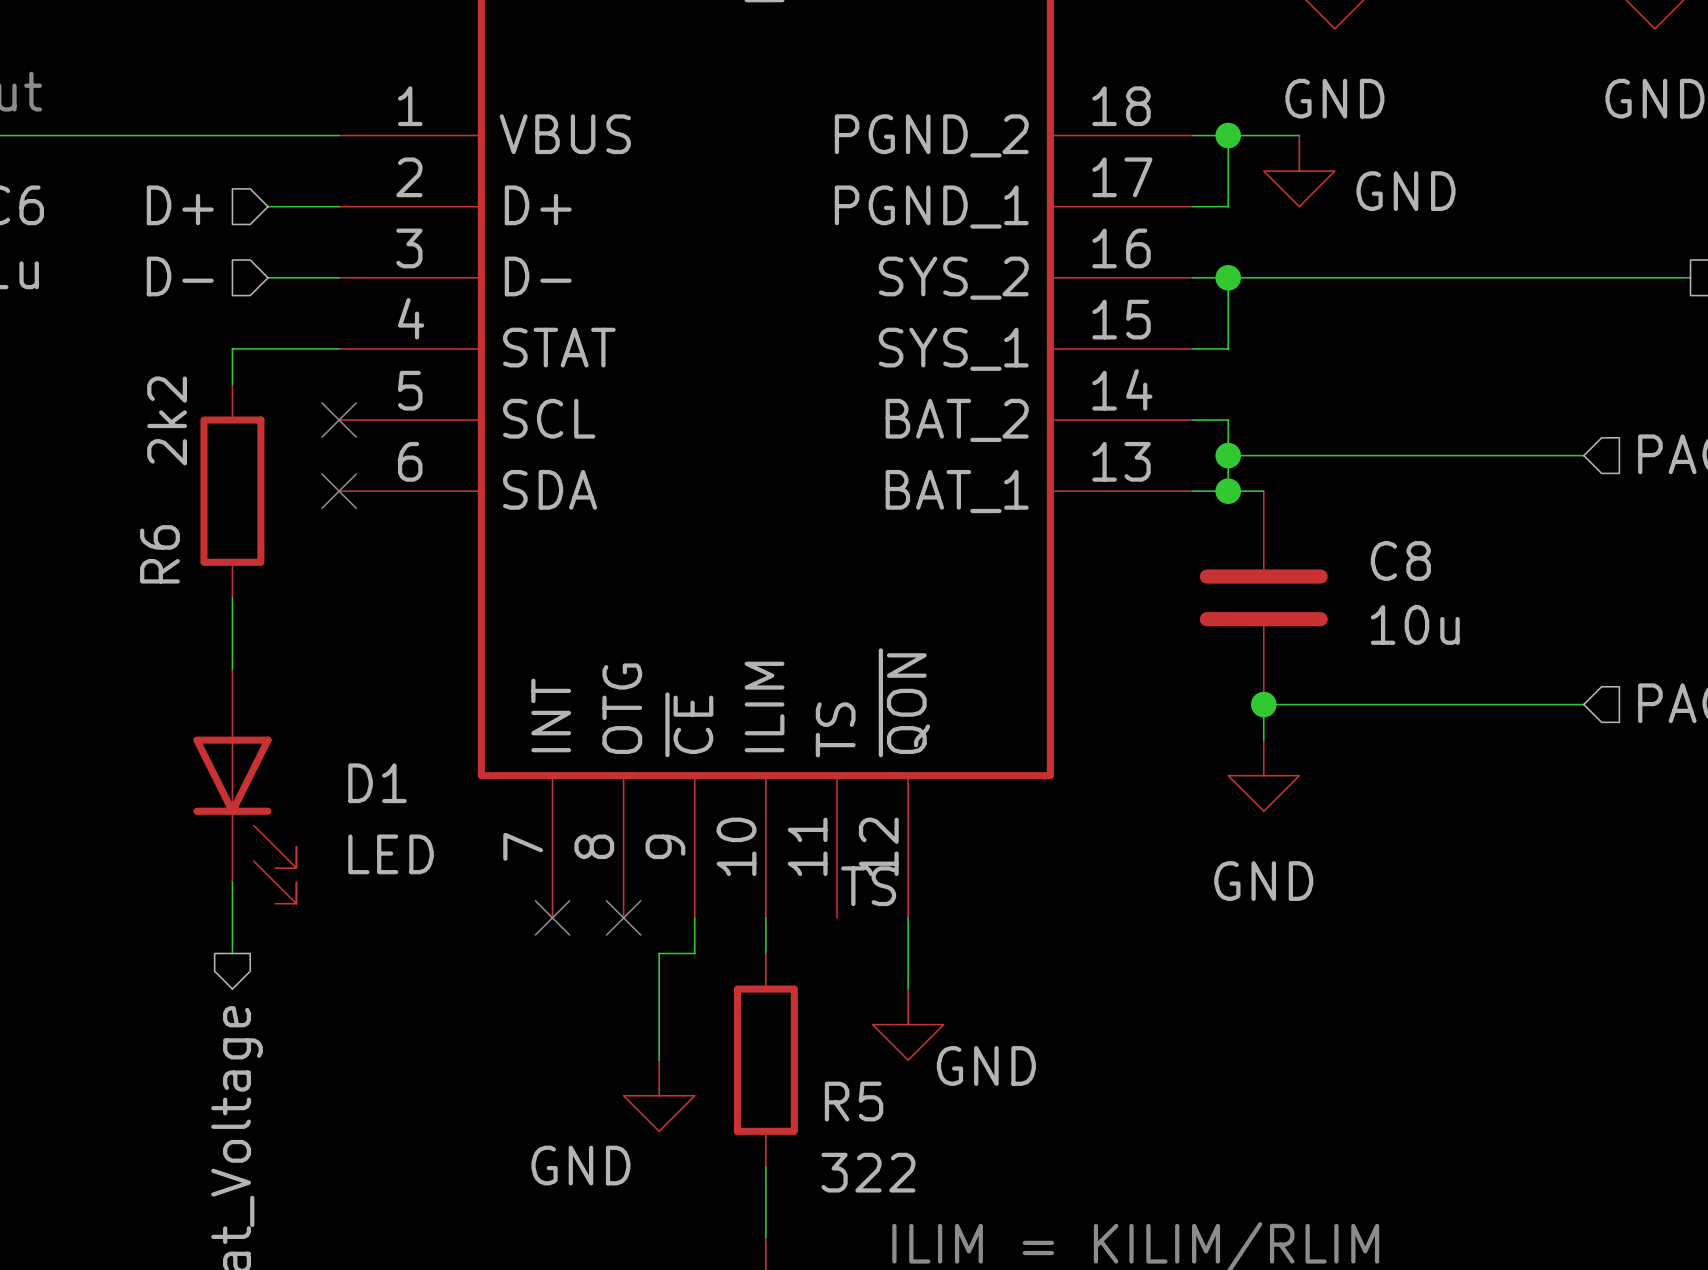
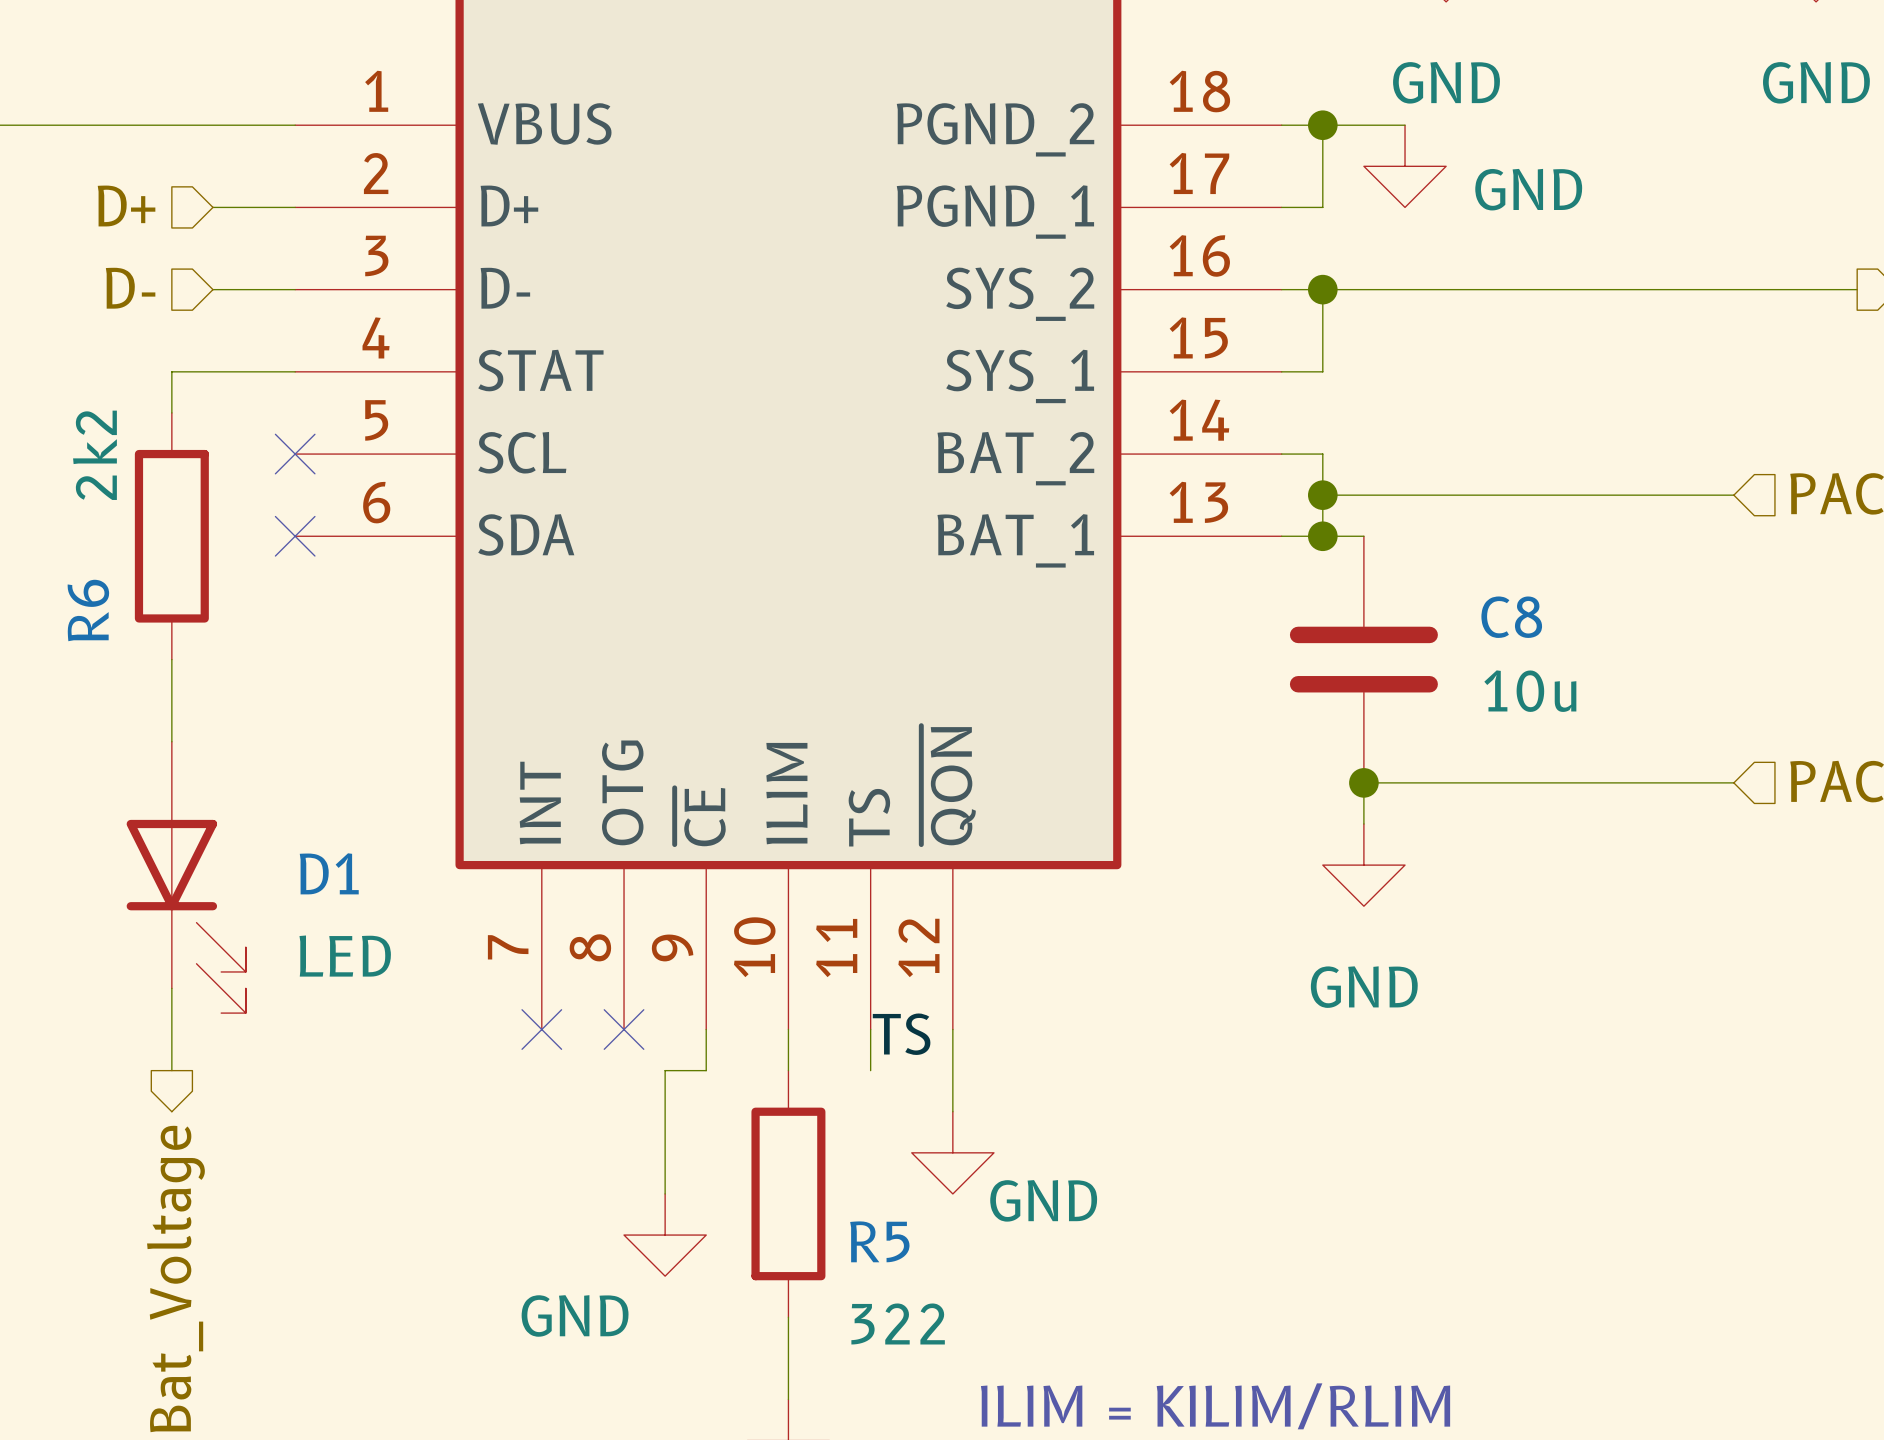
label position: TS (868, 886) -> TS (901, 1034)
wire: none -> (870, 1029) (870, 1070)

